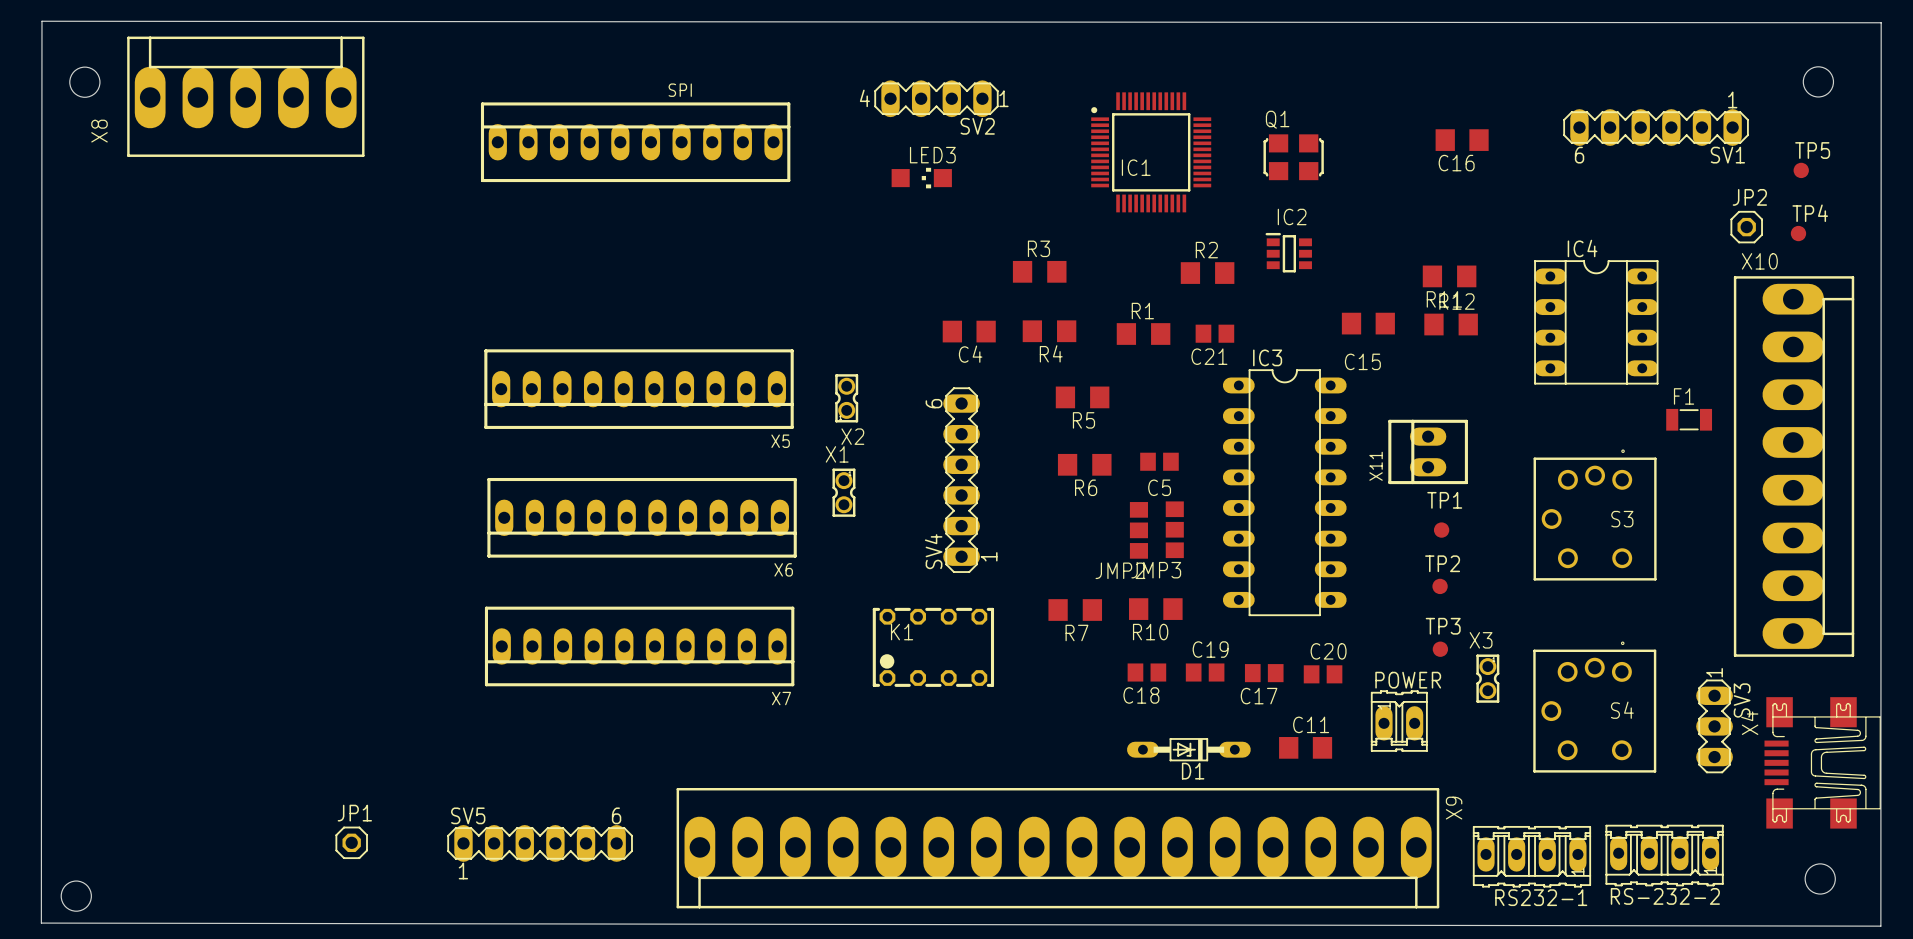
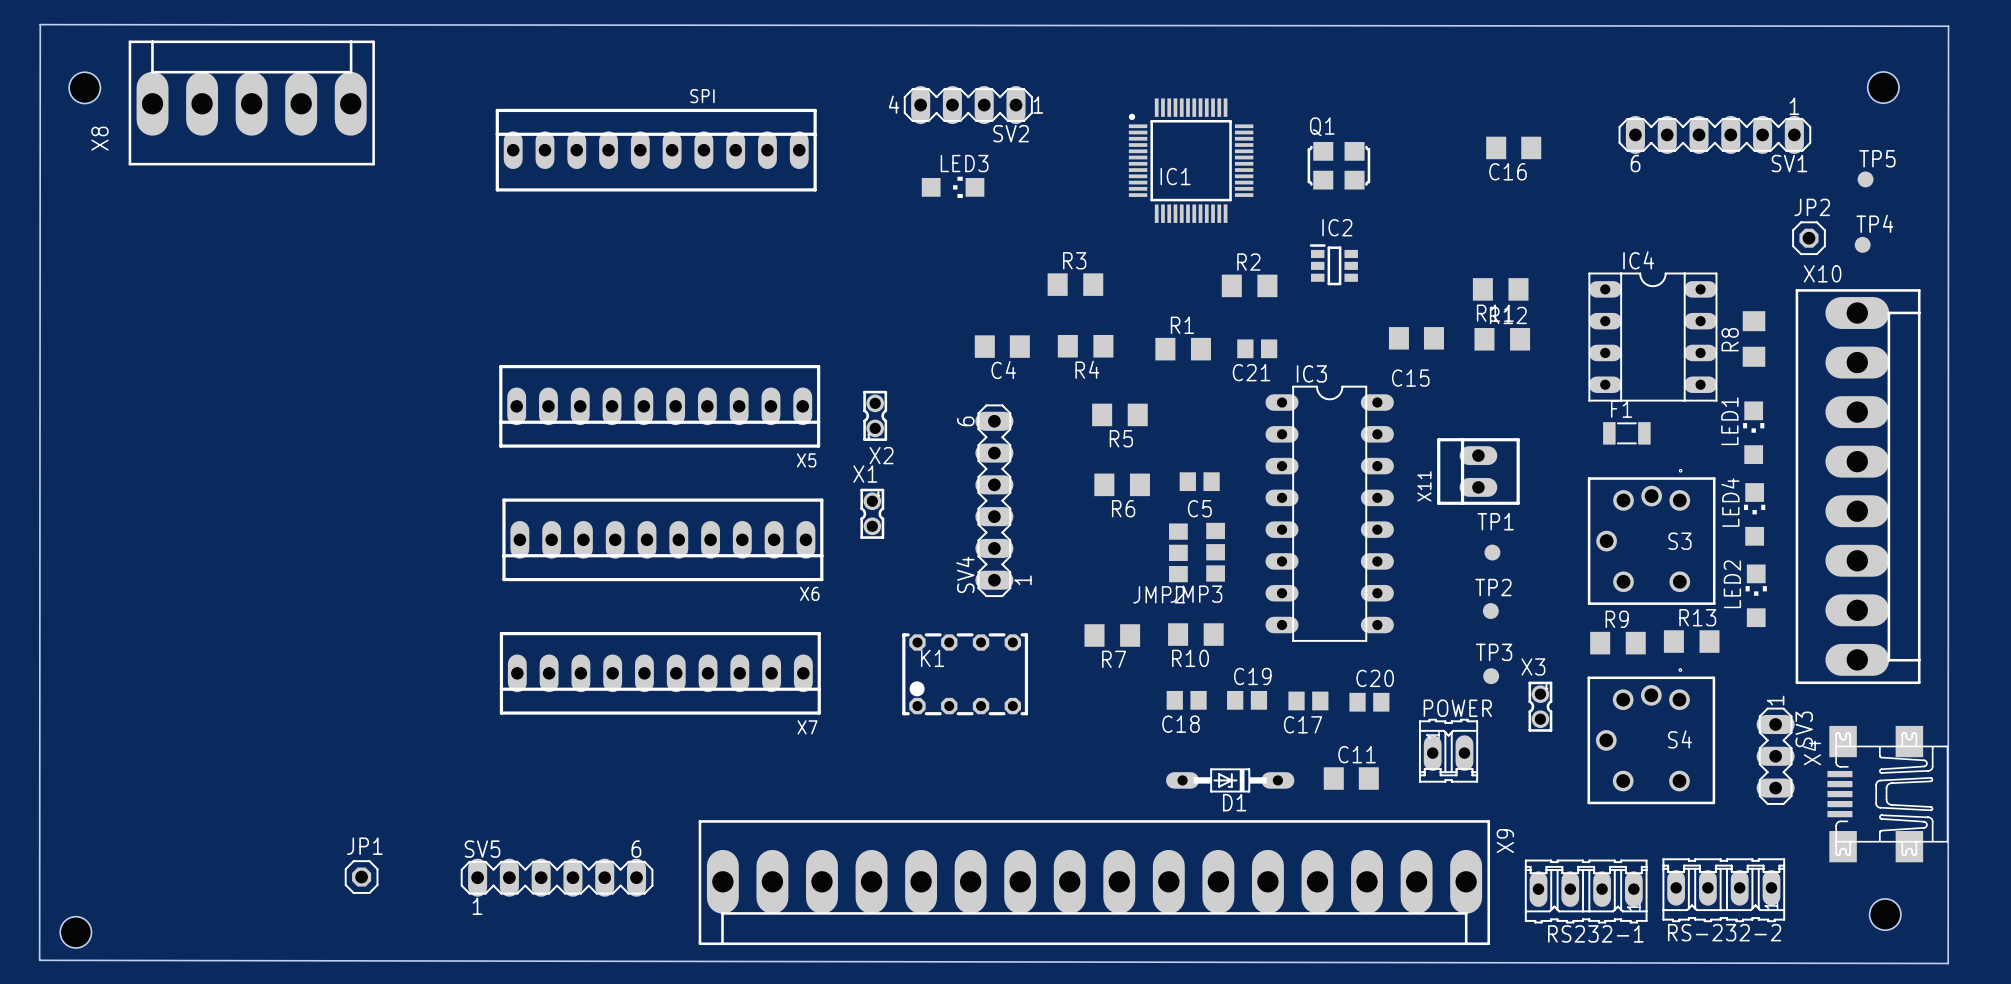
R8: none -> (1754, 338)
LED1: none -> (1753, 432)
F1 position: (1689, 419) -> (1626, 433)
LED4: none -> (1754, 514)
LED2: none -> (1756, 595)
R13: none -> (1691, 641)
R9: none -> (1617, 643)

